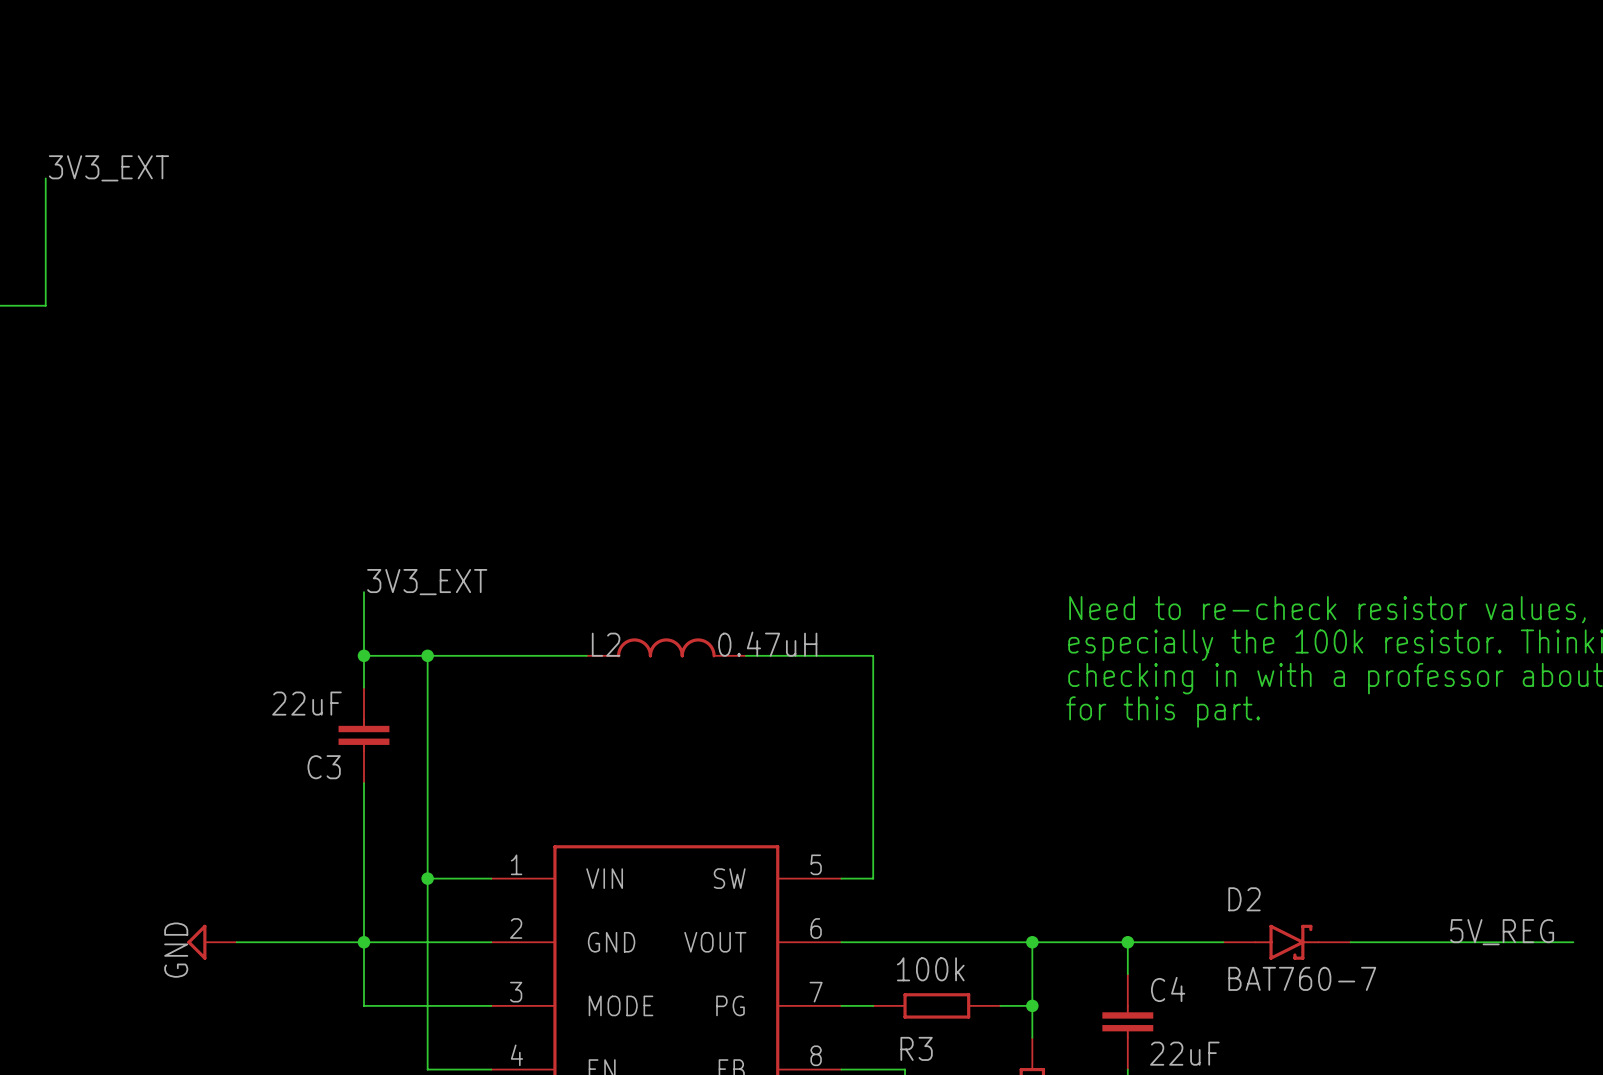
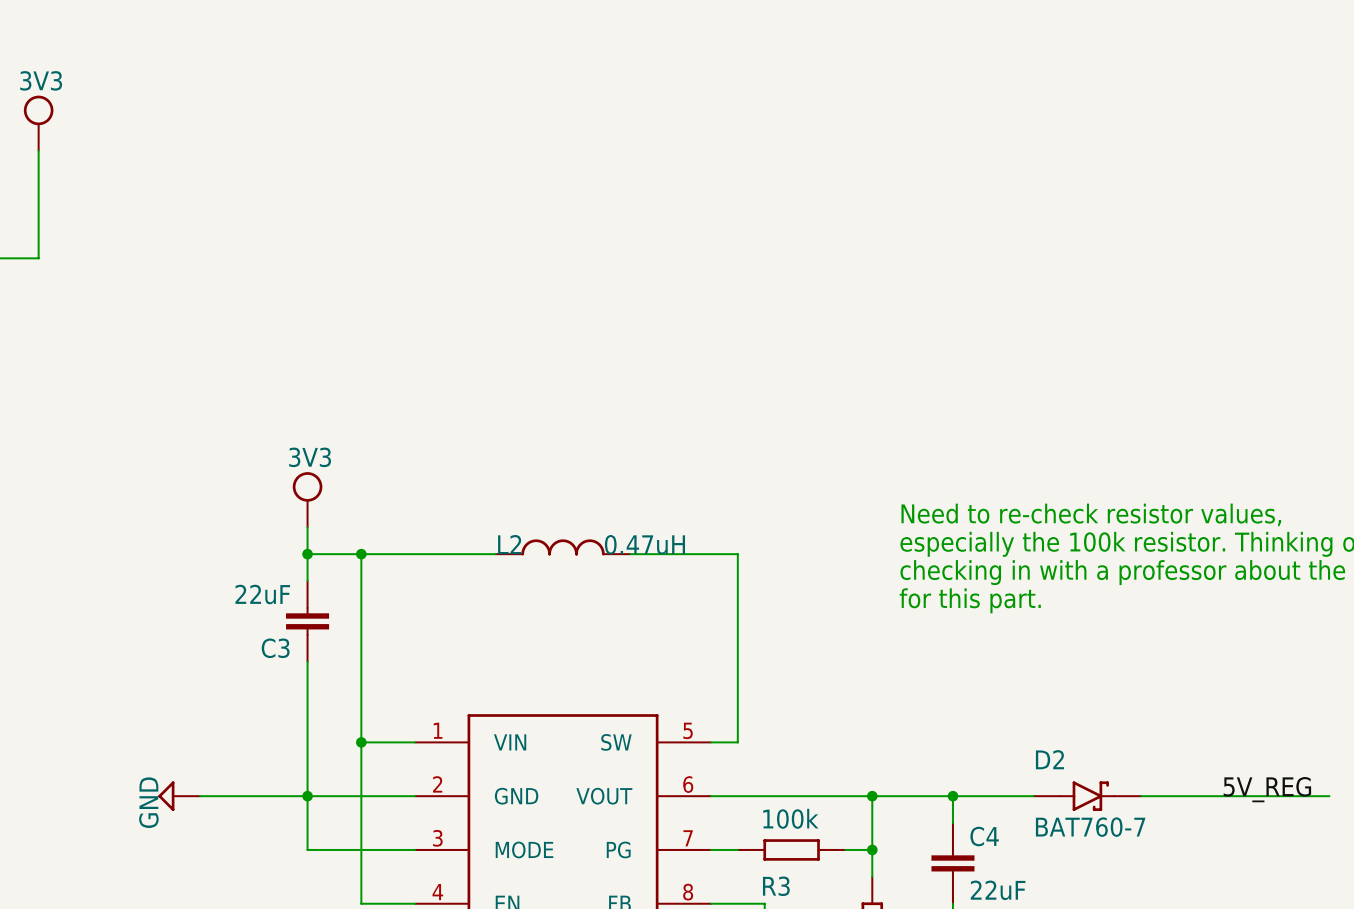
power symbol: none -> 3V3 (38, 123)
label: 3V3_EXT (108, 168) -> none
label: 3V3_EXT (427, 582) -> none
power symbol: none -> 3V3 (307, 499)

